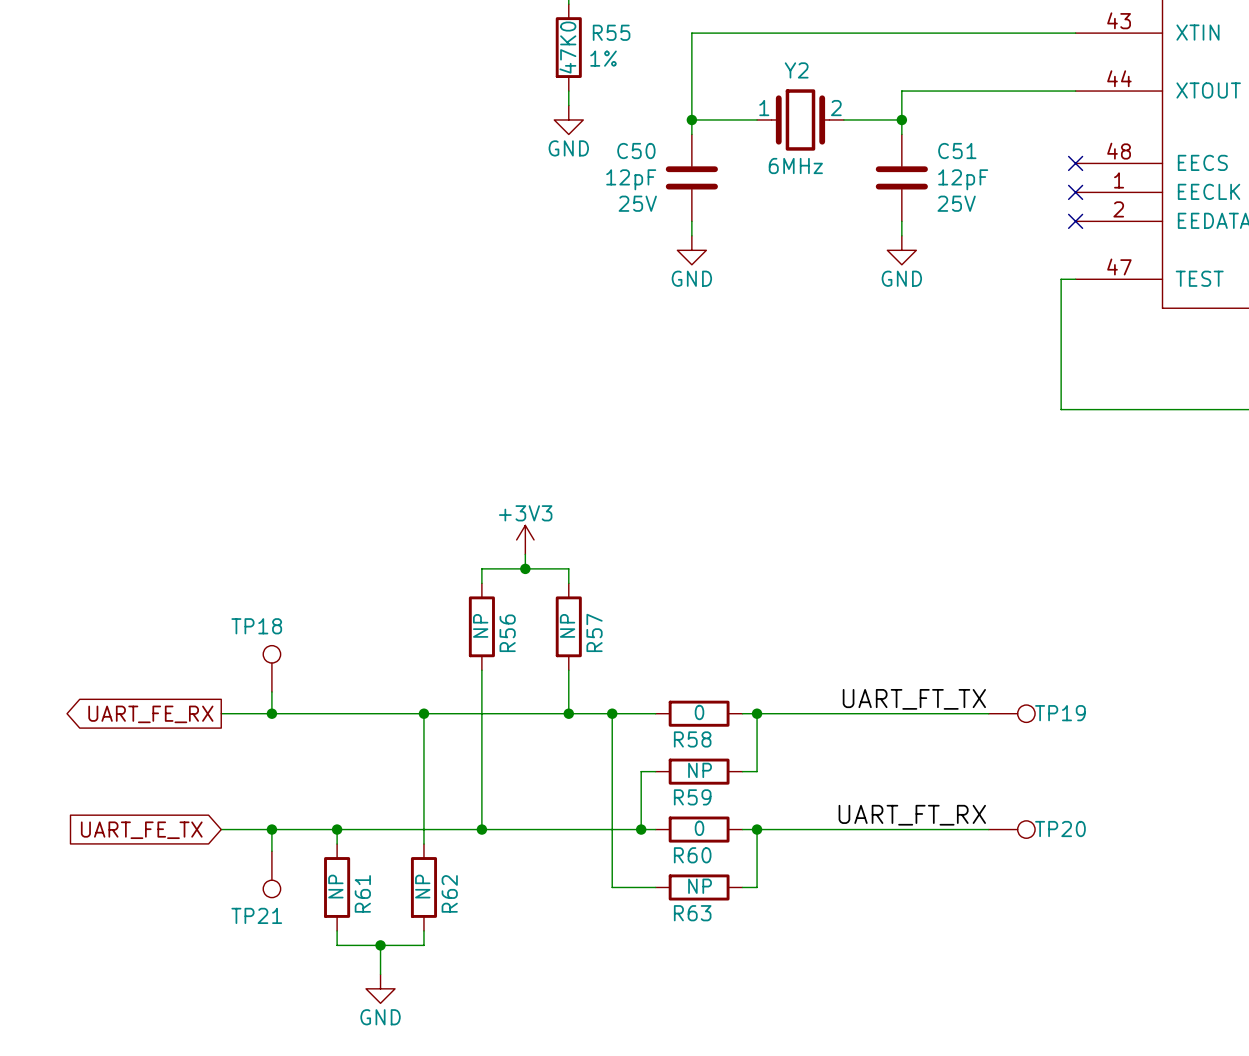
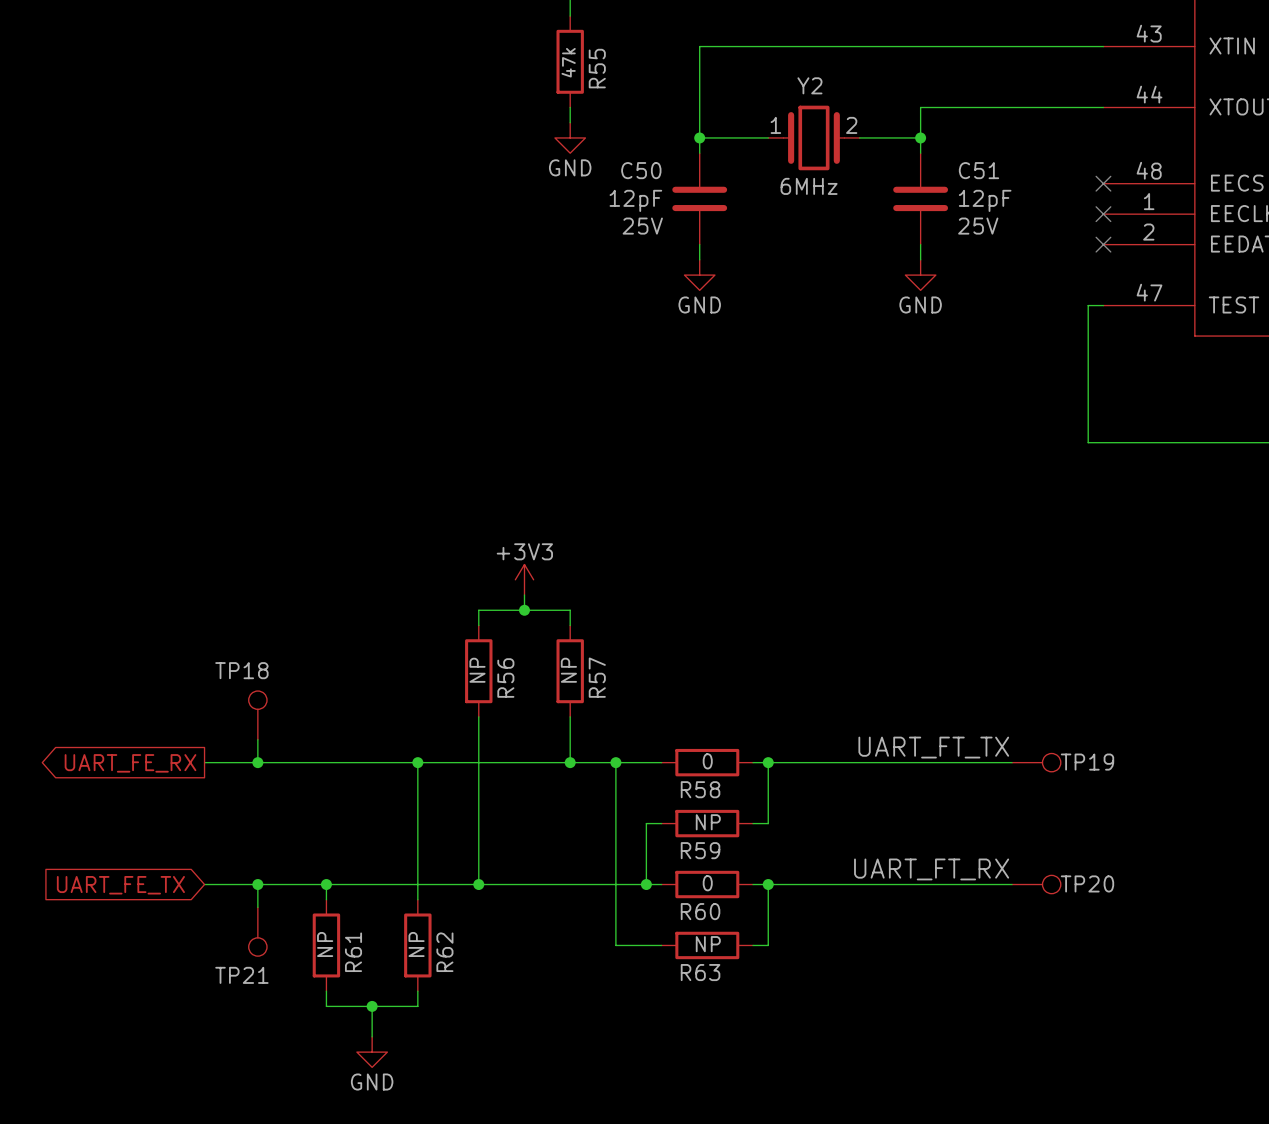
R55 name rotation: 0° (611, 32) -> 90° counterclockwise (597, 68)
R55 text: 47K0 (567, 47) -> none
R55 text: none -> 47k (568, 62)
R55 text: 1% (603, 58) -> none

